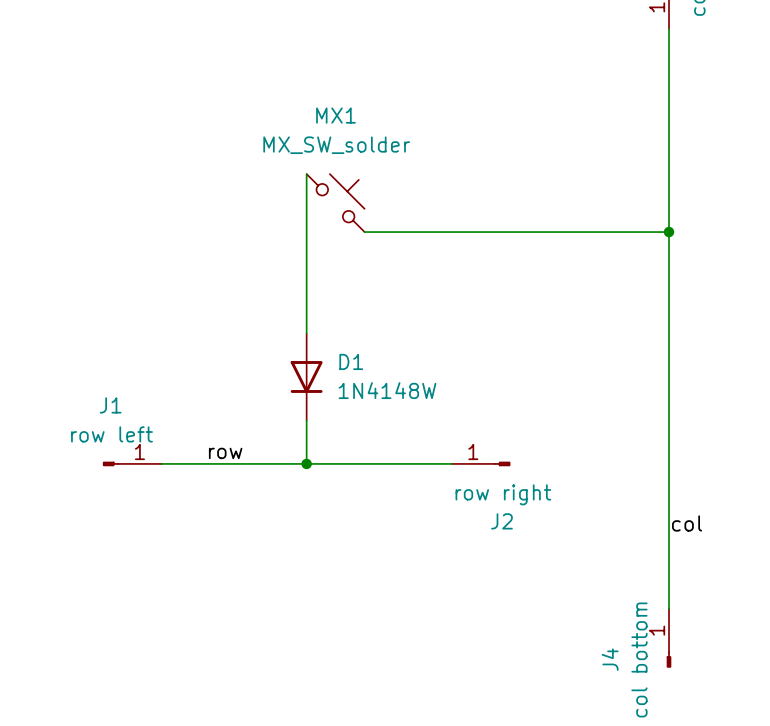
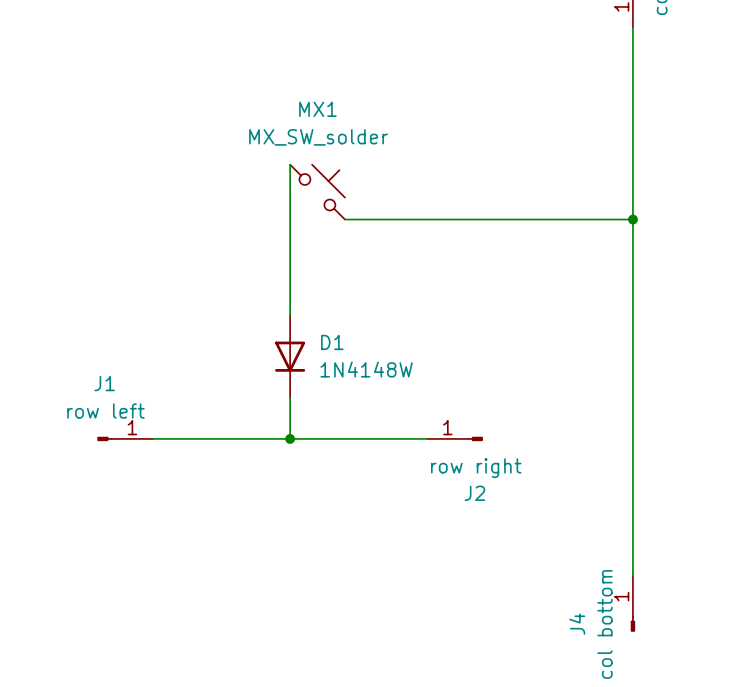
label: row (225, 453) -> none
label: col (687, 523) -> none

